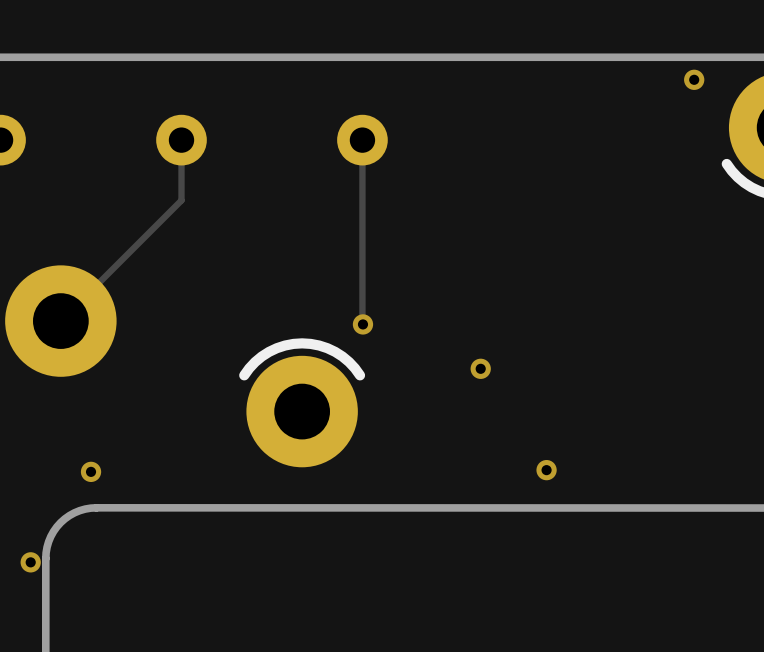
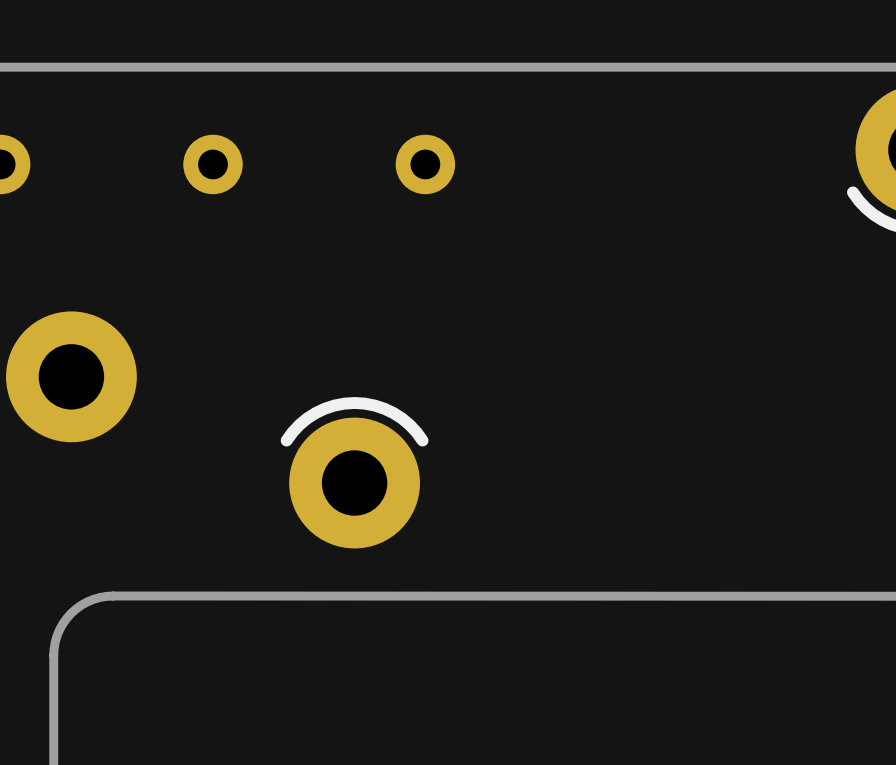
via: (694, 79) -> none
track: (181, 140) (181, 200) (60, 321) -> none
track: (362, 140) (362, 324) -> none
via: (362, 324) -> none
via: (480, 368) -> none
via: (546, 470) -> none
via: (91, 471) -> none
via: (30, 562) -> none

